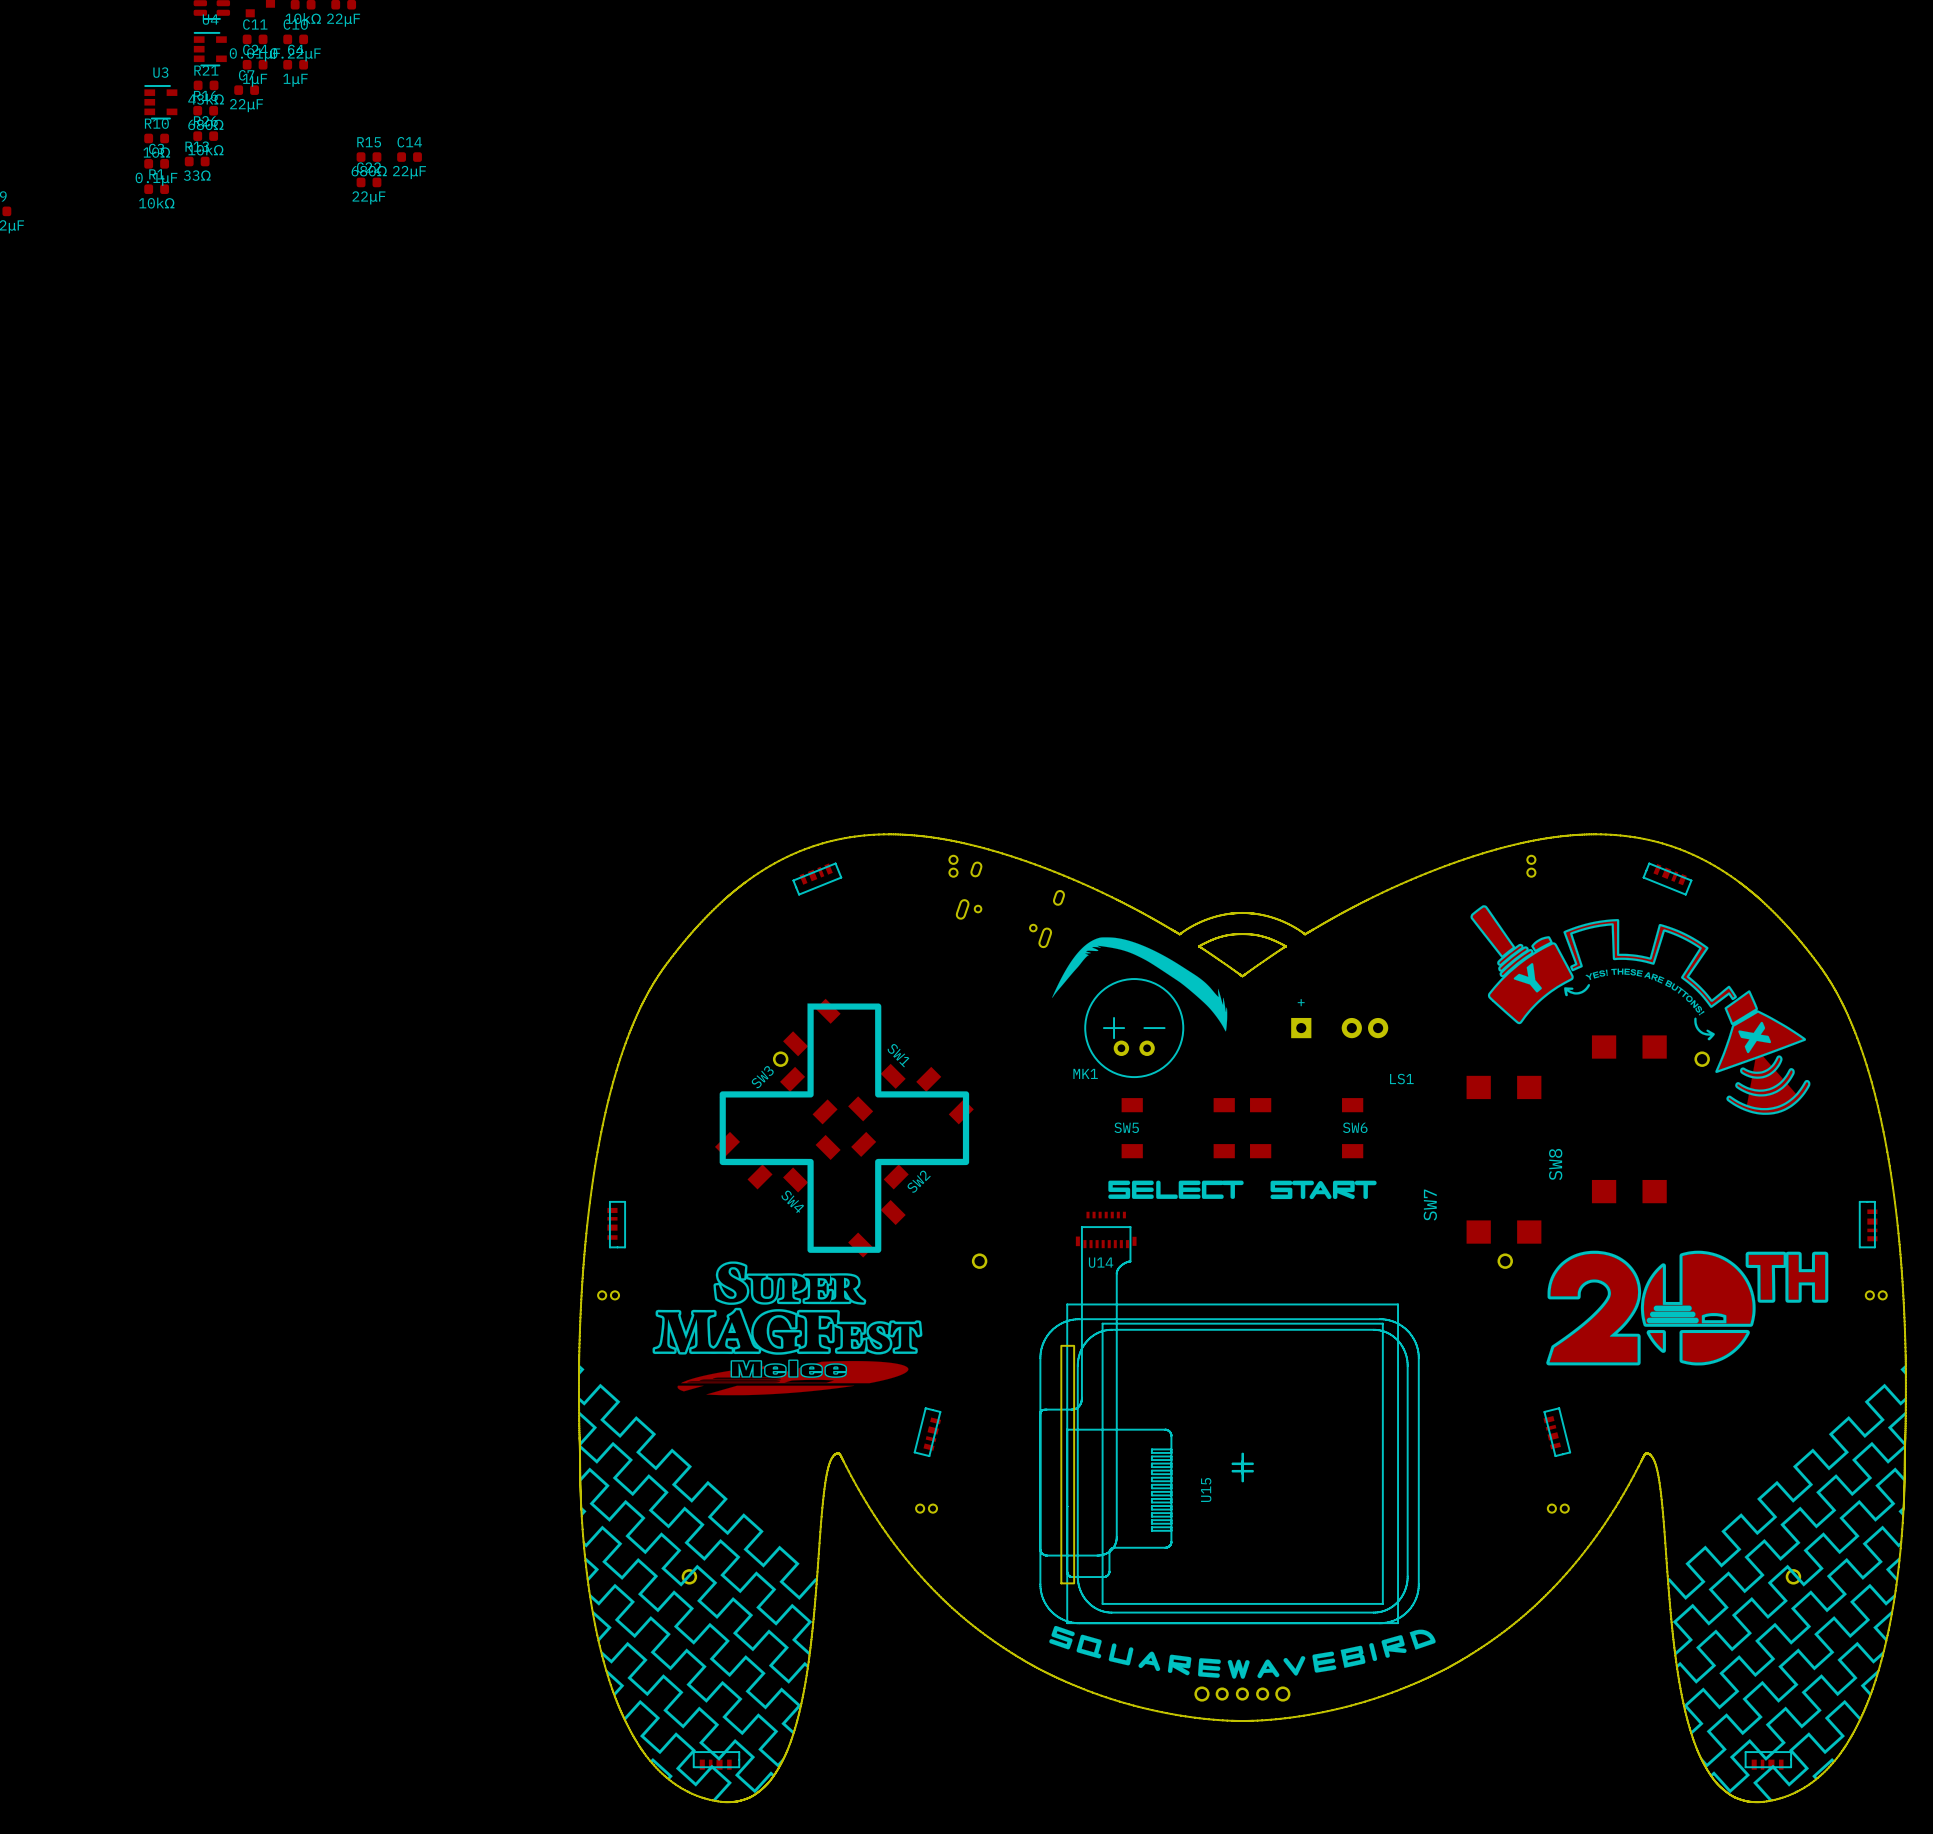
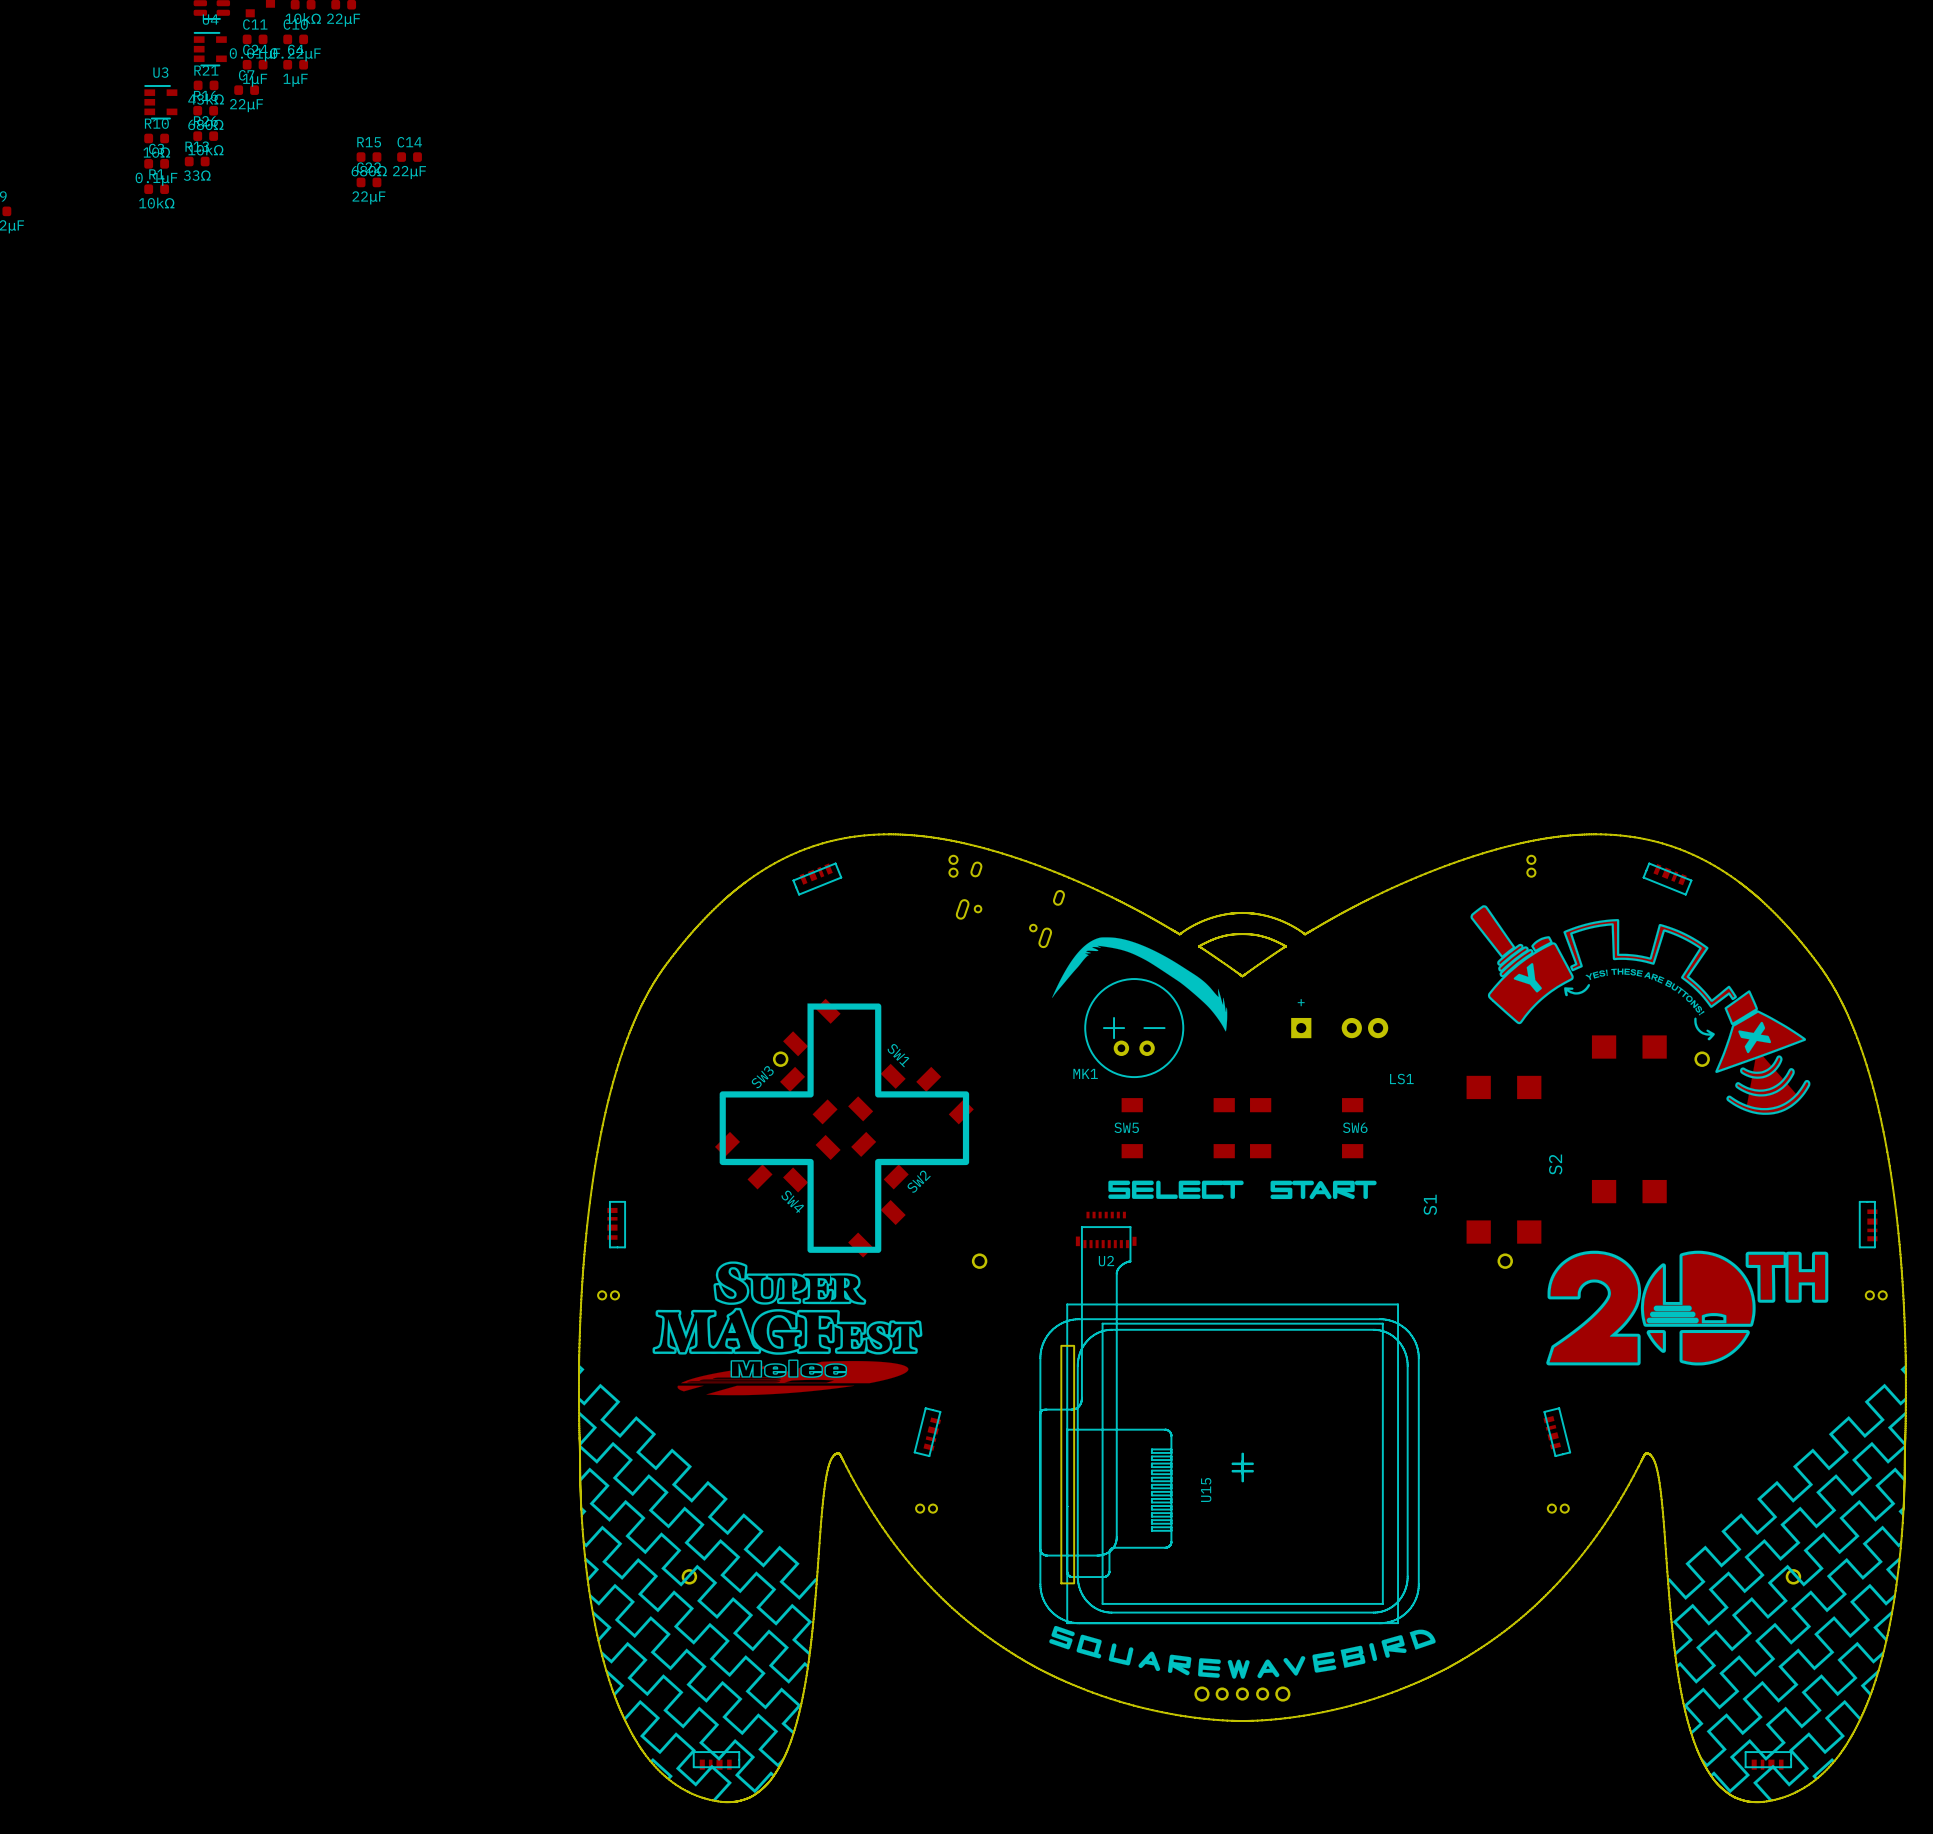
SW8 name: SW8 (1555, 1164) -> S2 (1555, 1164)
SW7 name: SW7 (1430, 1205) -> S1 (1430, 1204)
U14 name: U14 (1101, 1262) -> U2 (1106, 1261)

